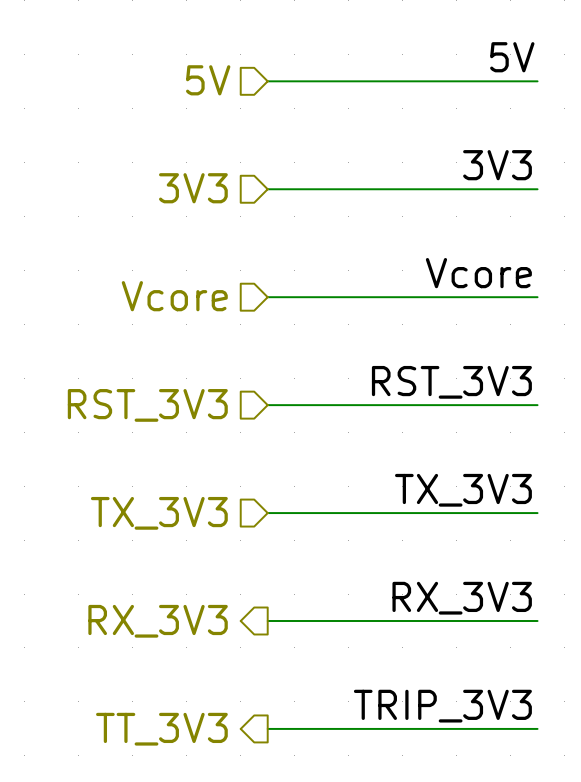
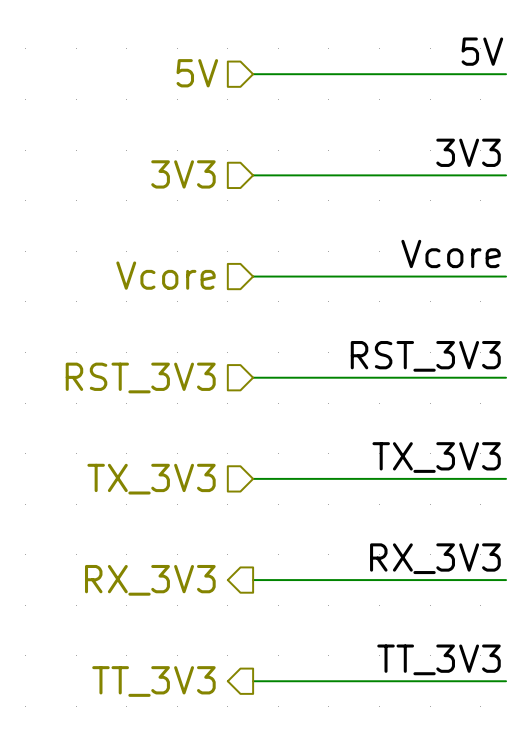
label: TRIP_3V3 (442, 706) -> TT_3V3 (439, 659)

